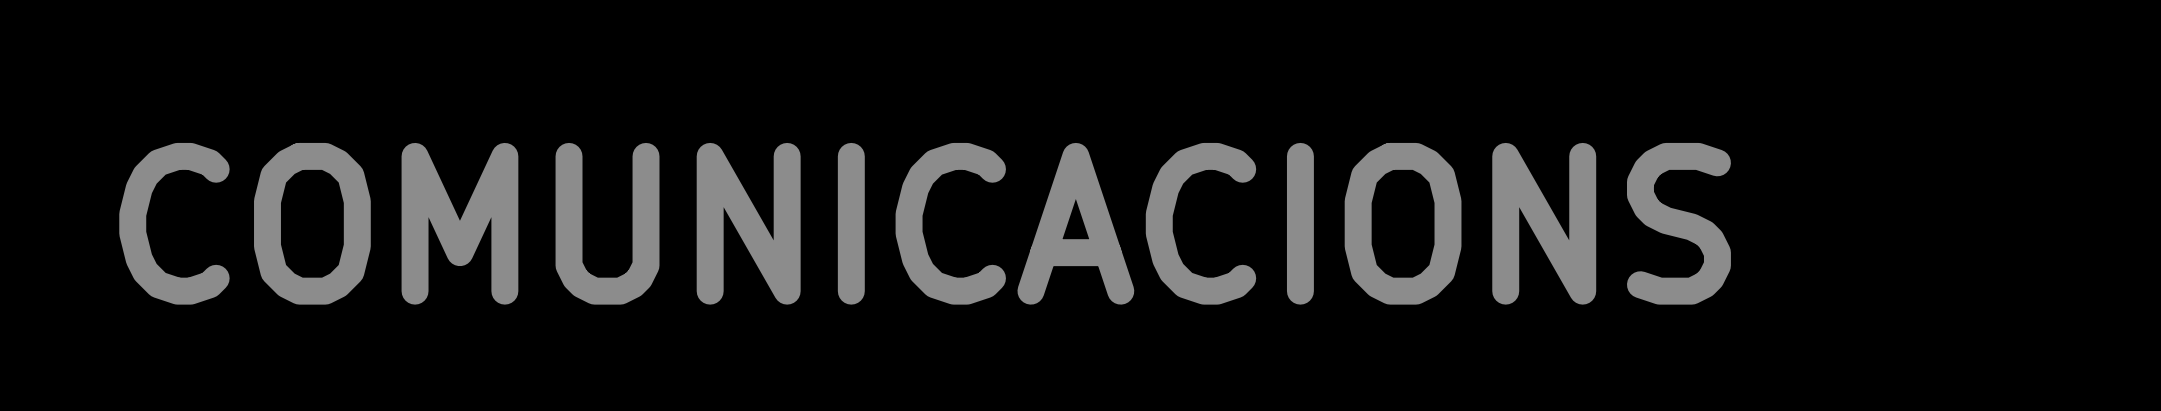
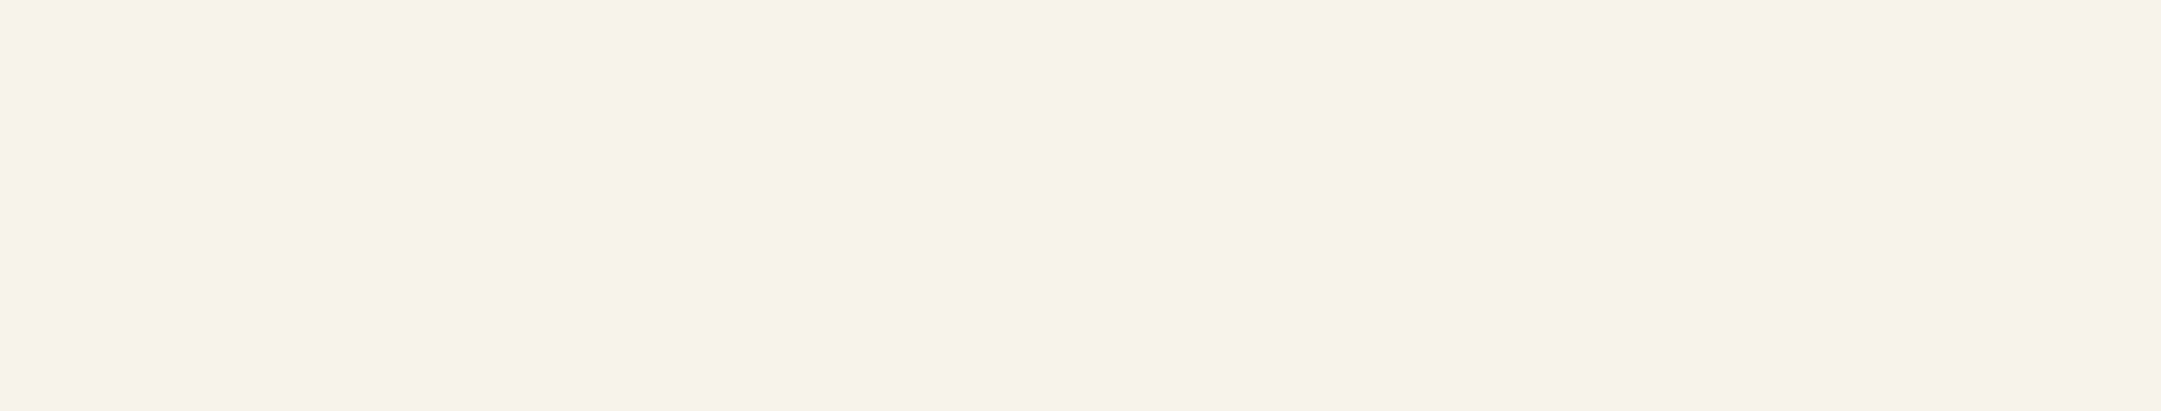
text: COMUNICACIONS (925, 223) -> none

